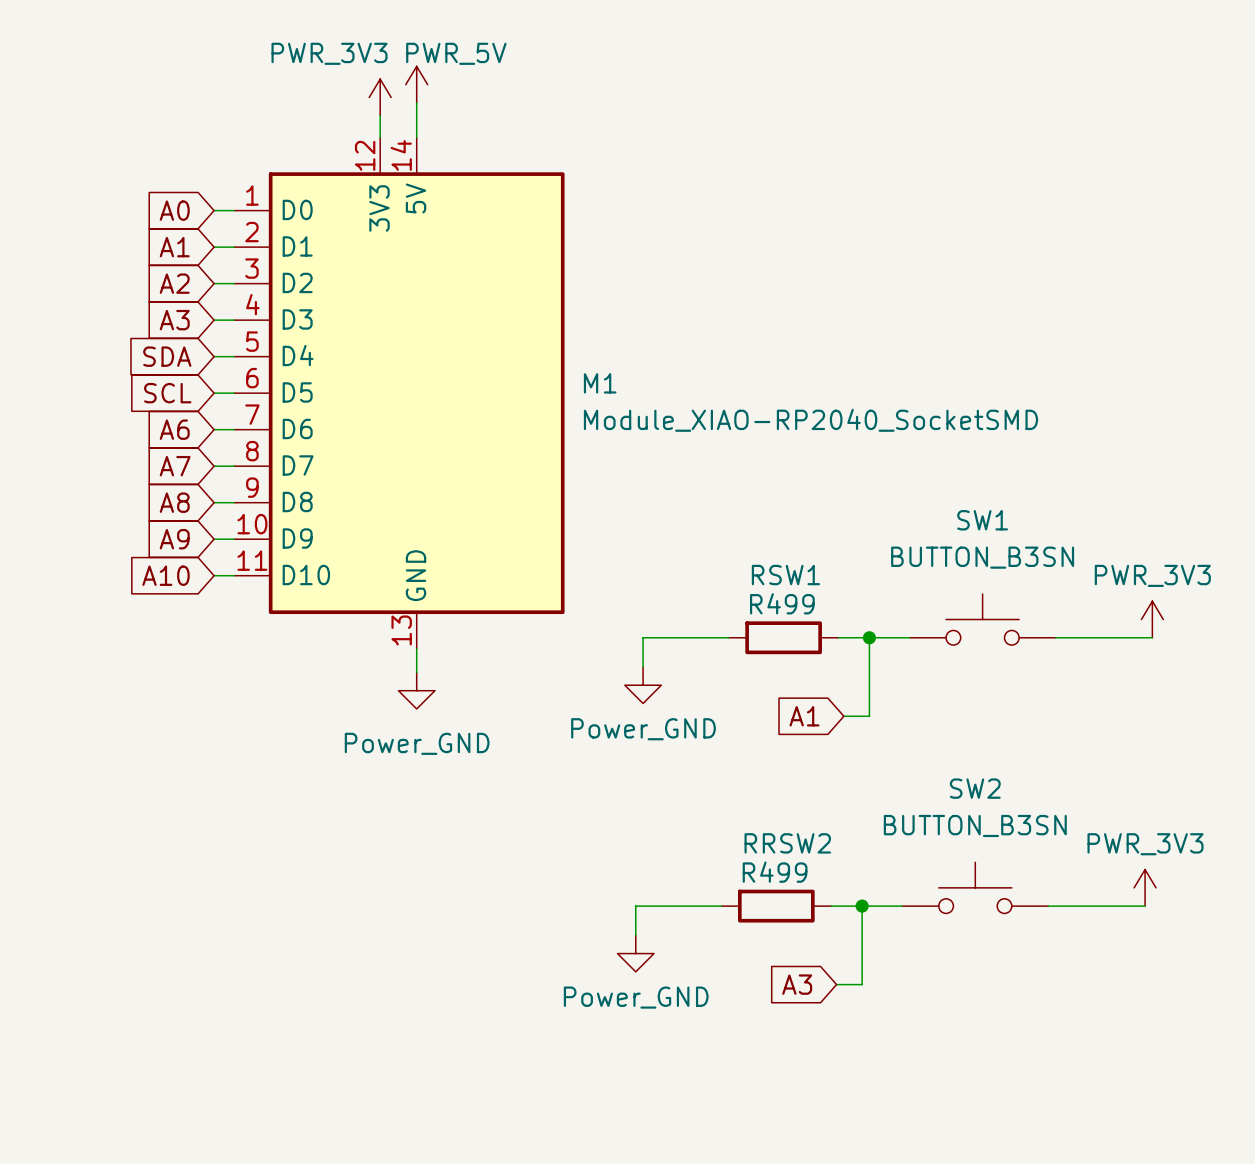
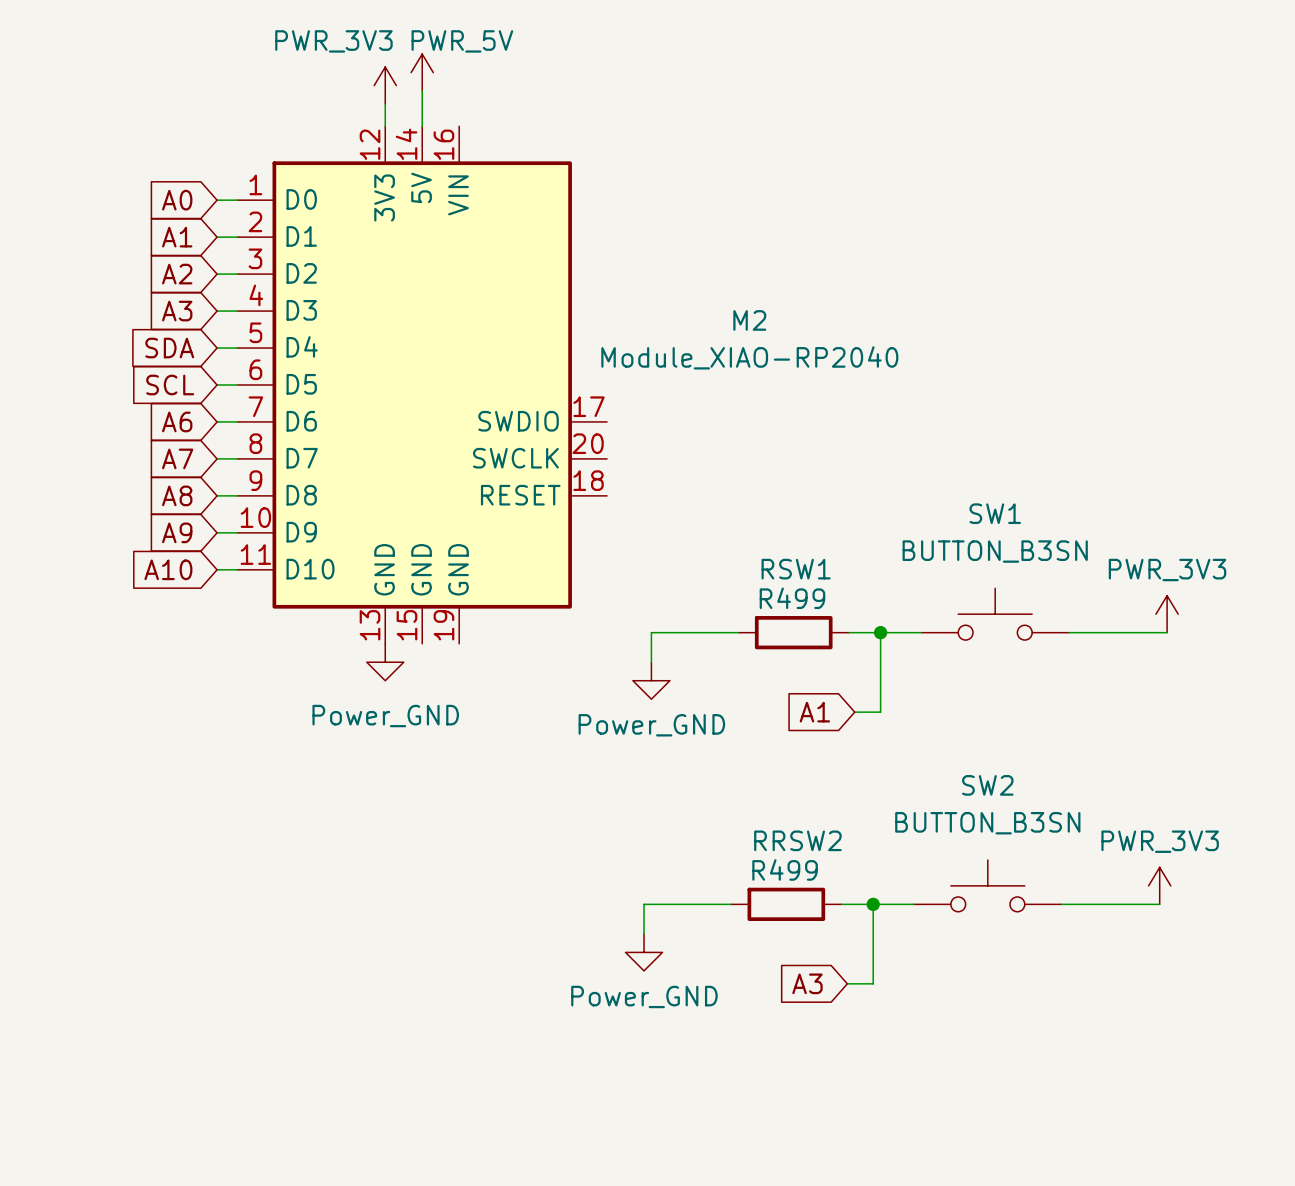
M1: Module_XIAO-RP2040_SocketSMD (399, 393) -> none
M2: none -> Module_XIAO-RP2040 (422, 384)
wire: (416, 648) (416, 672) -> none
power symbol position: Power_GND (416, 690) -> Power_GND (385, 662)

